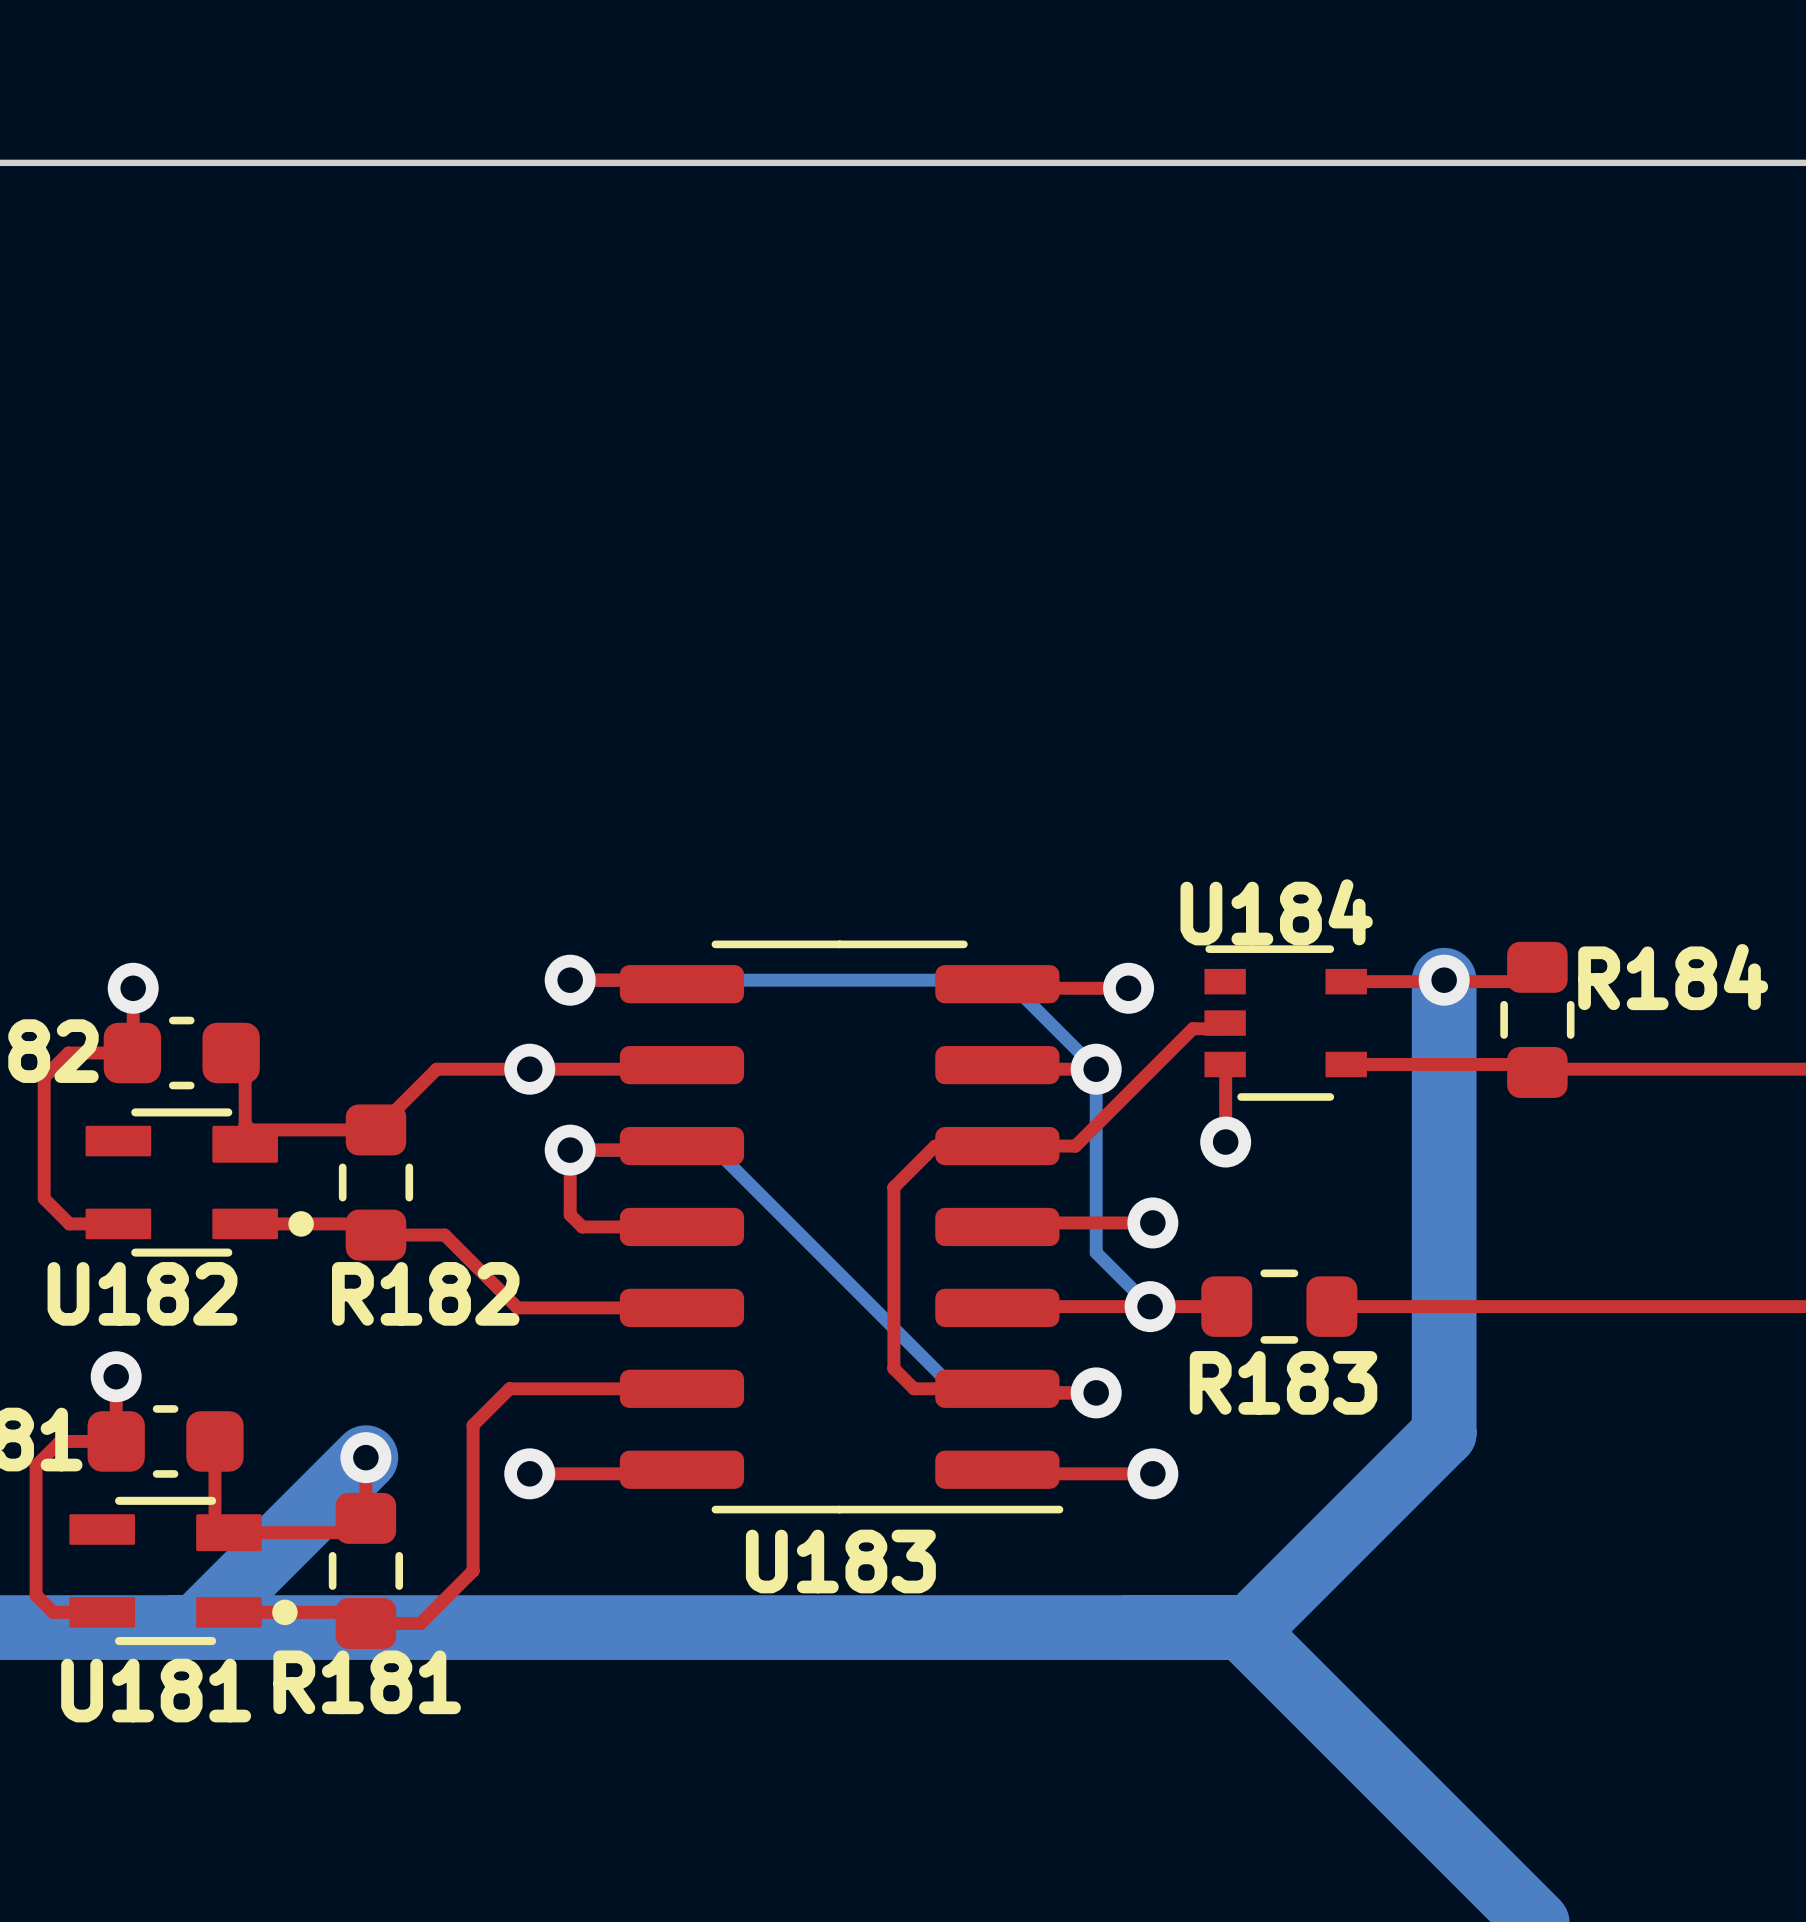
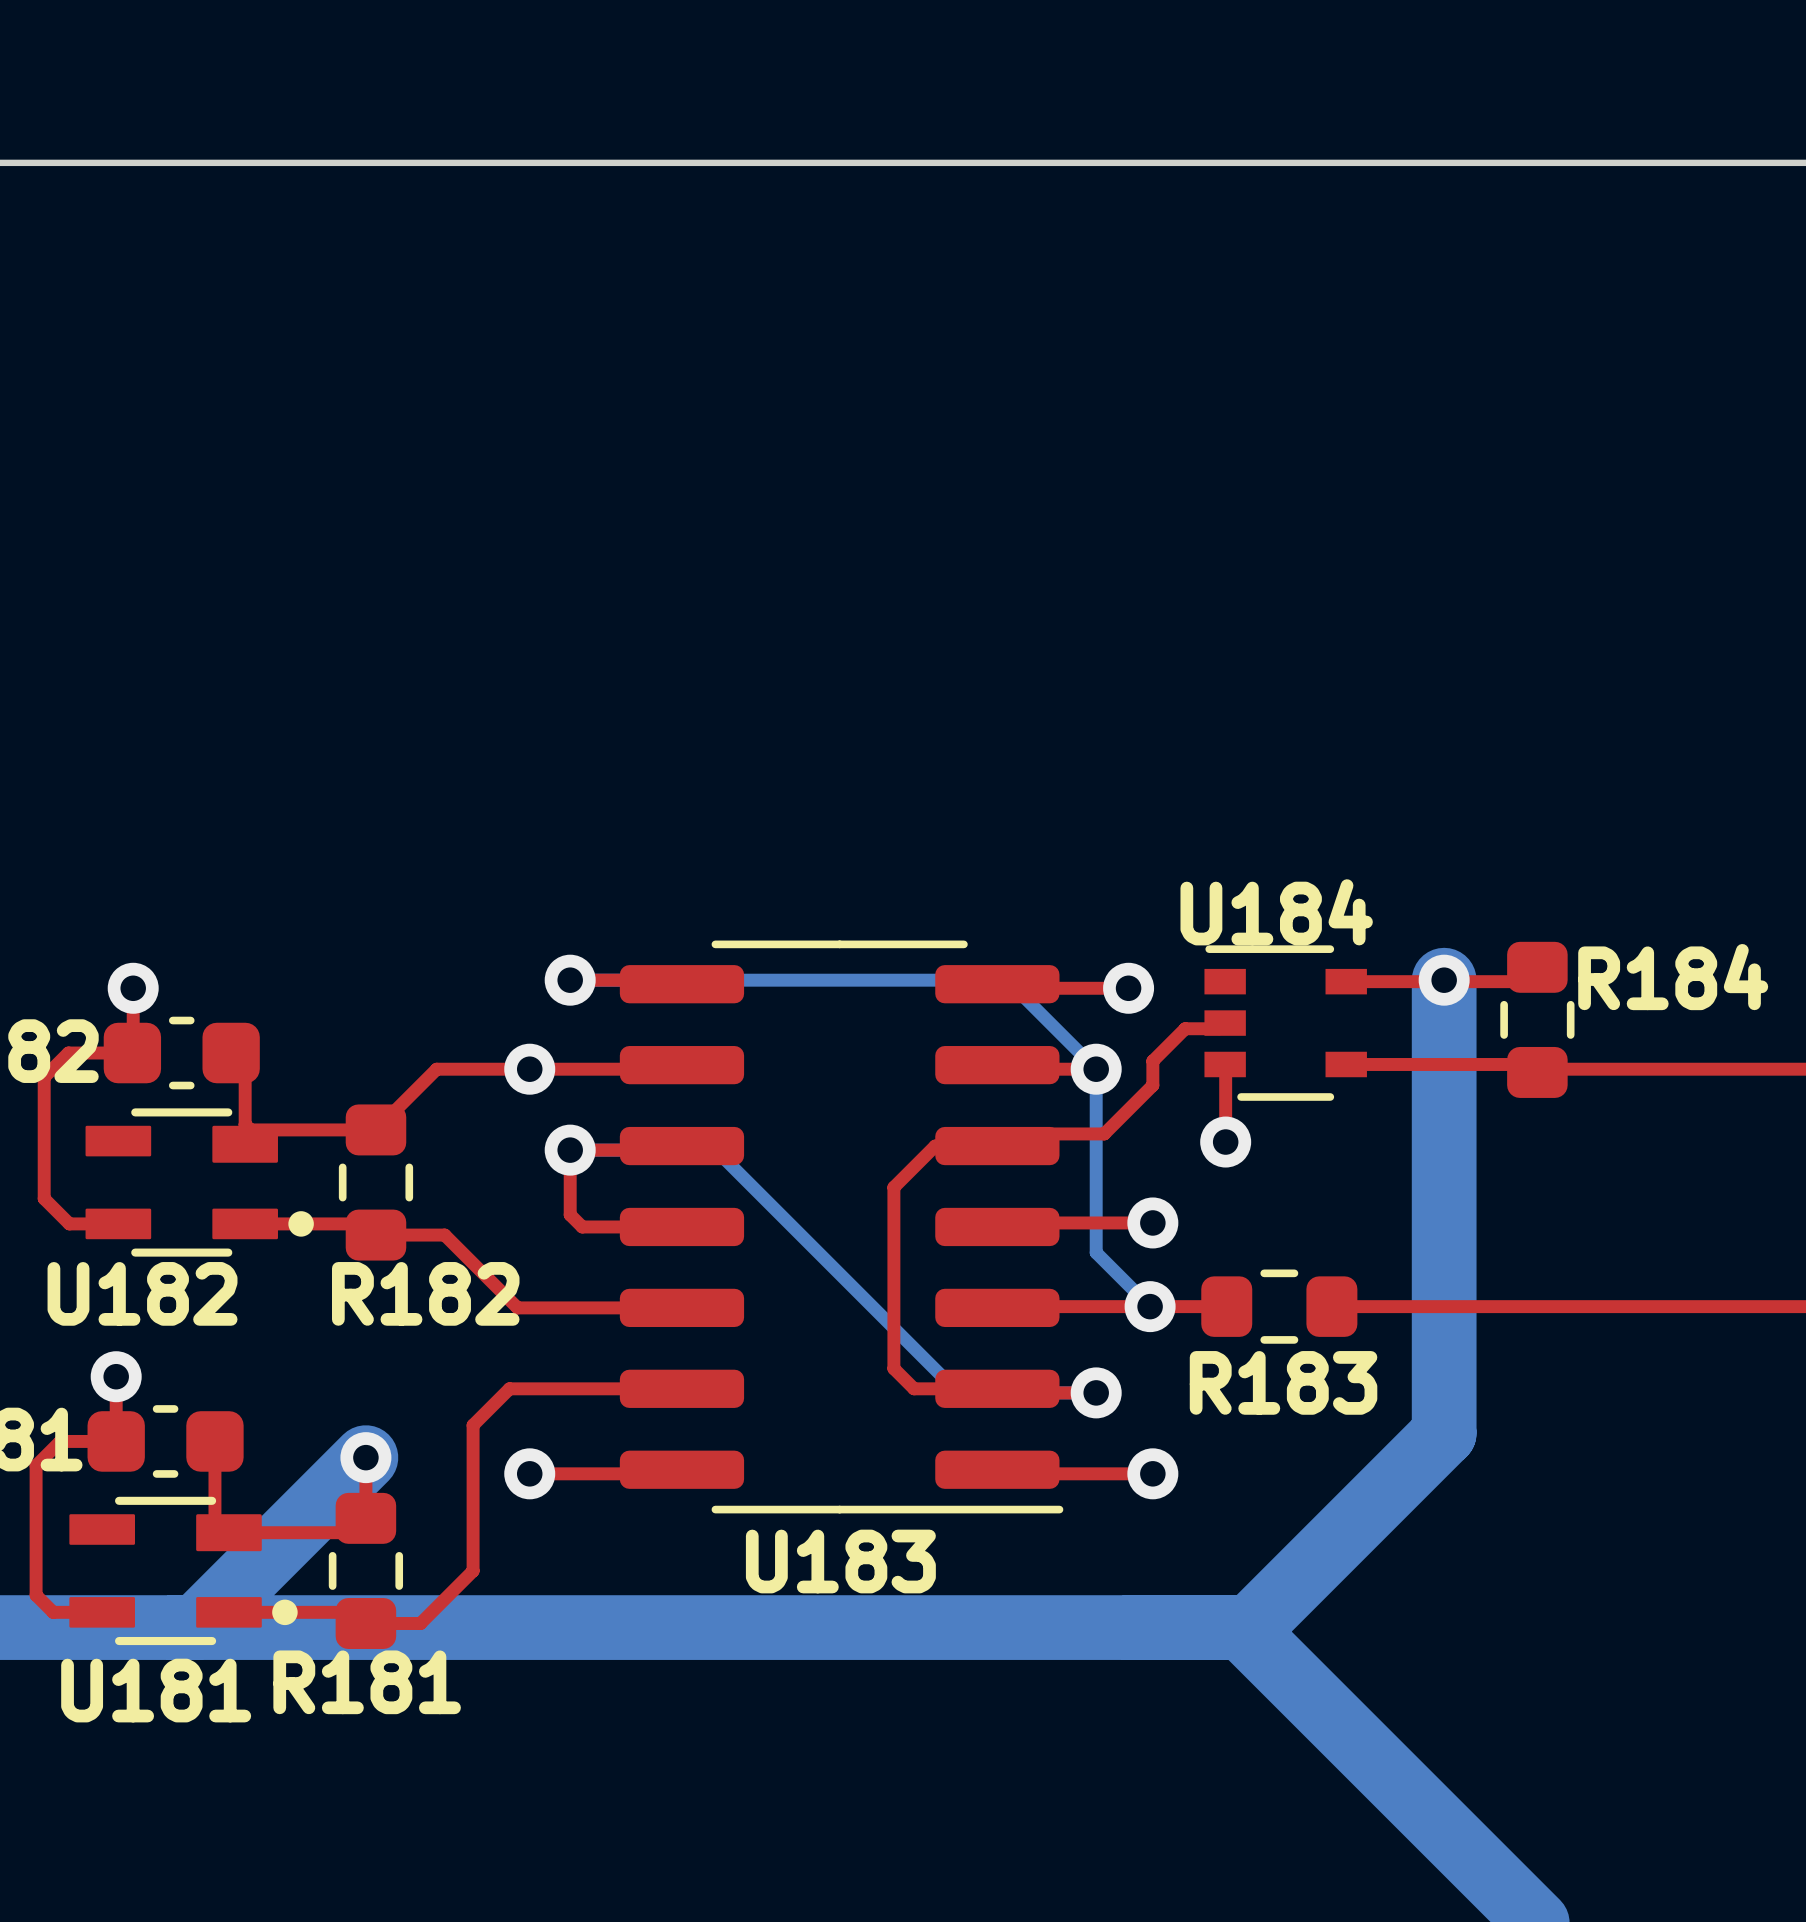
top track: (1192, 1028) (1075, 1146) (997, 1146) -> (1192, 1028) (1185, 1028) (1152, 1061) (1152, 1085) (1104, 1133) (1009, 1133) (997, 1146)

